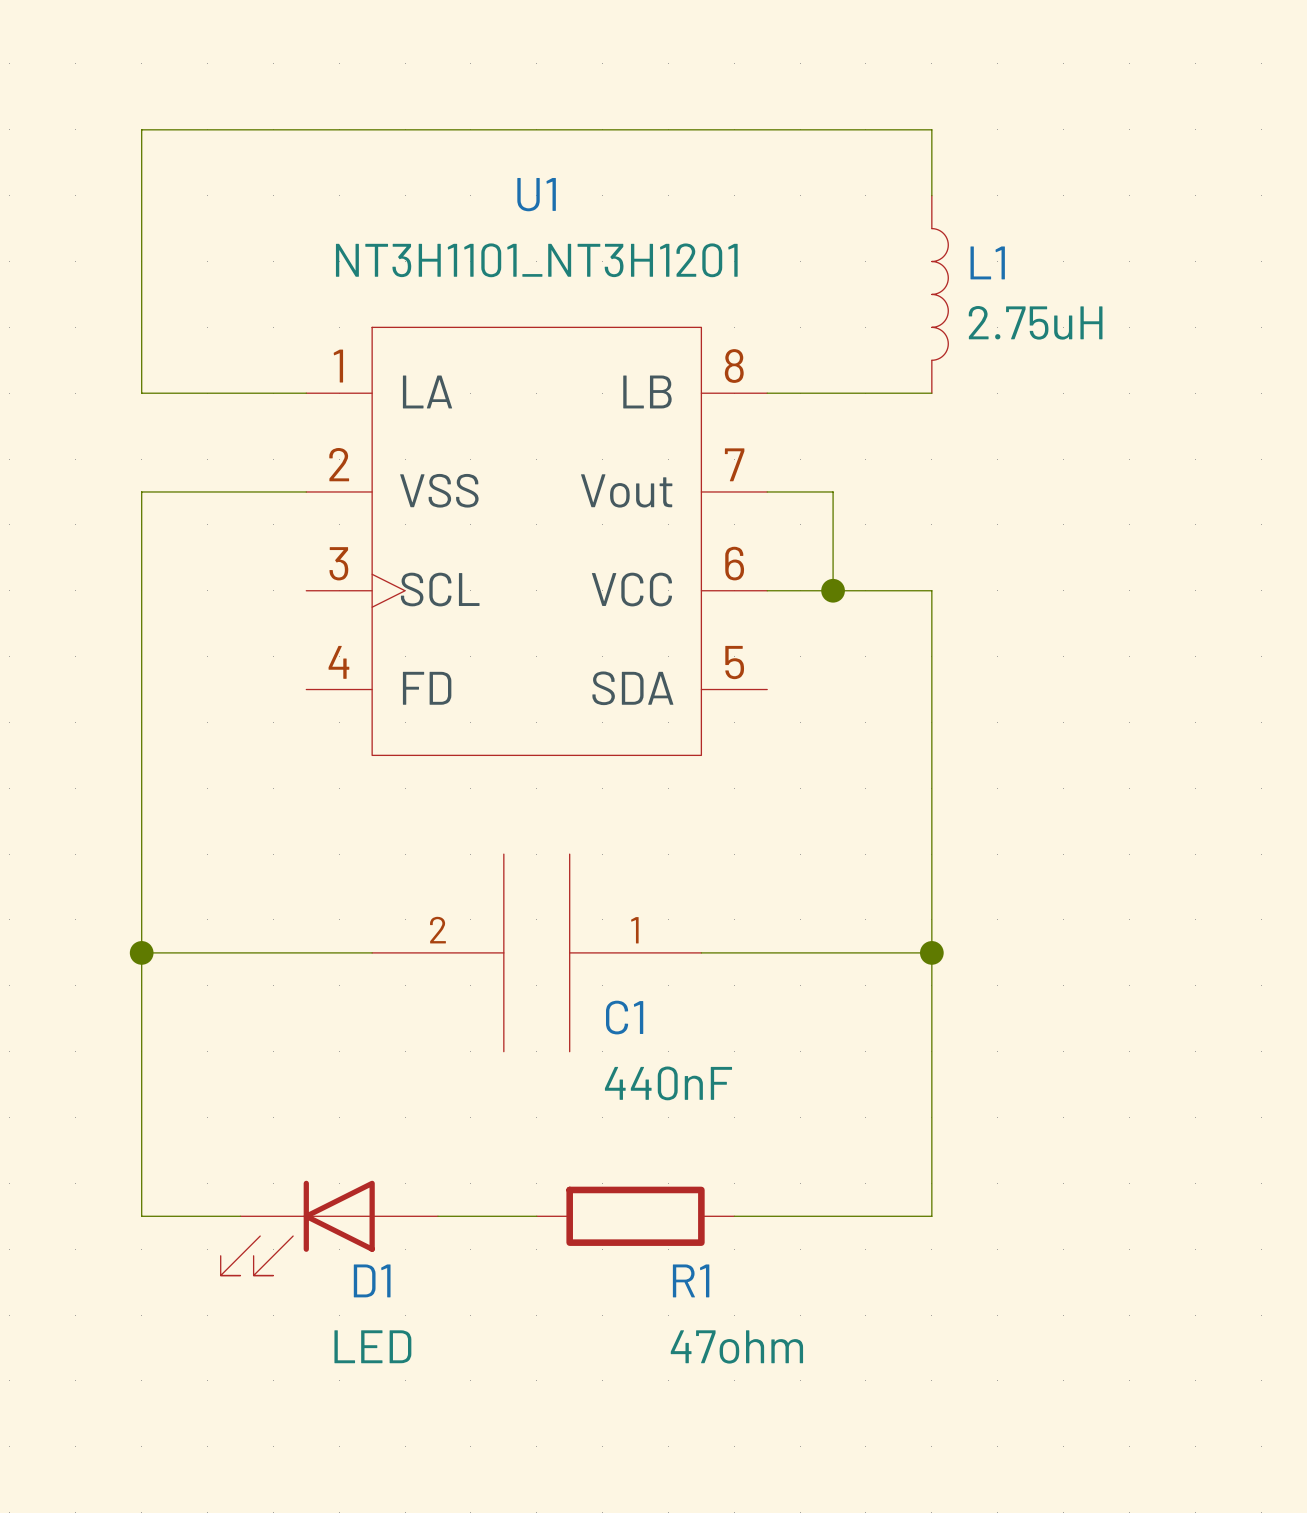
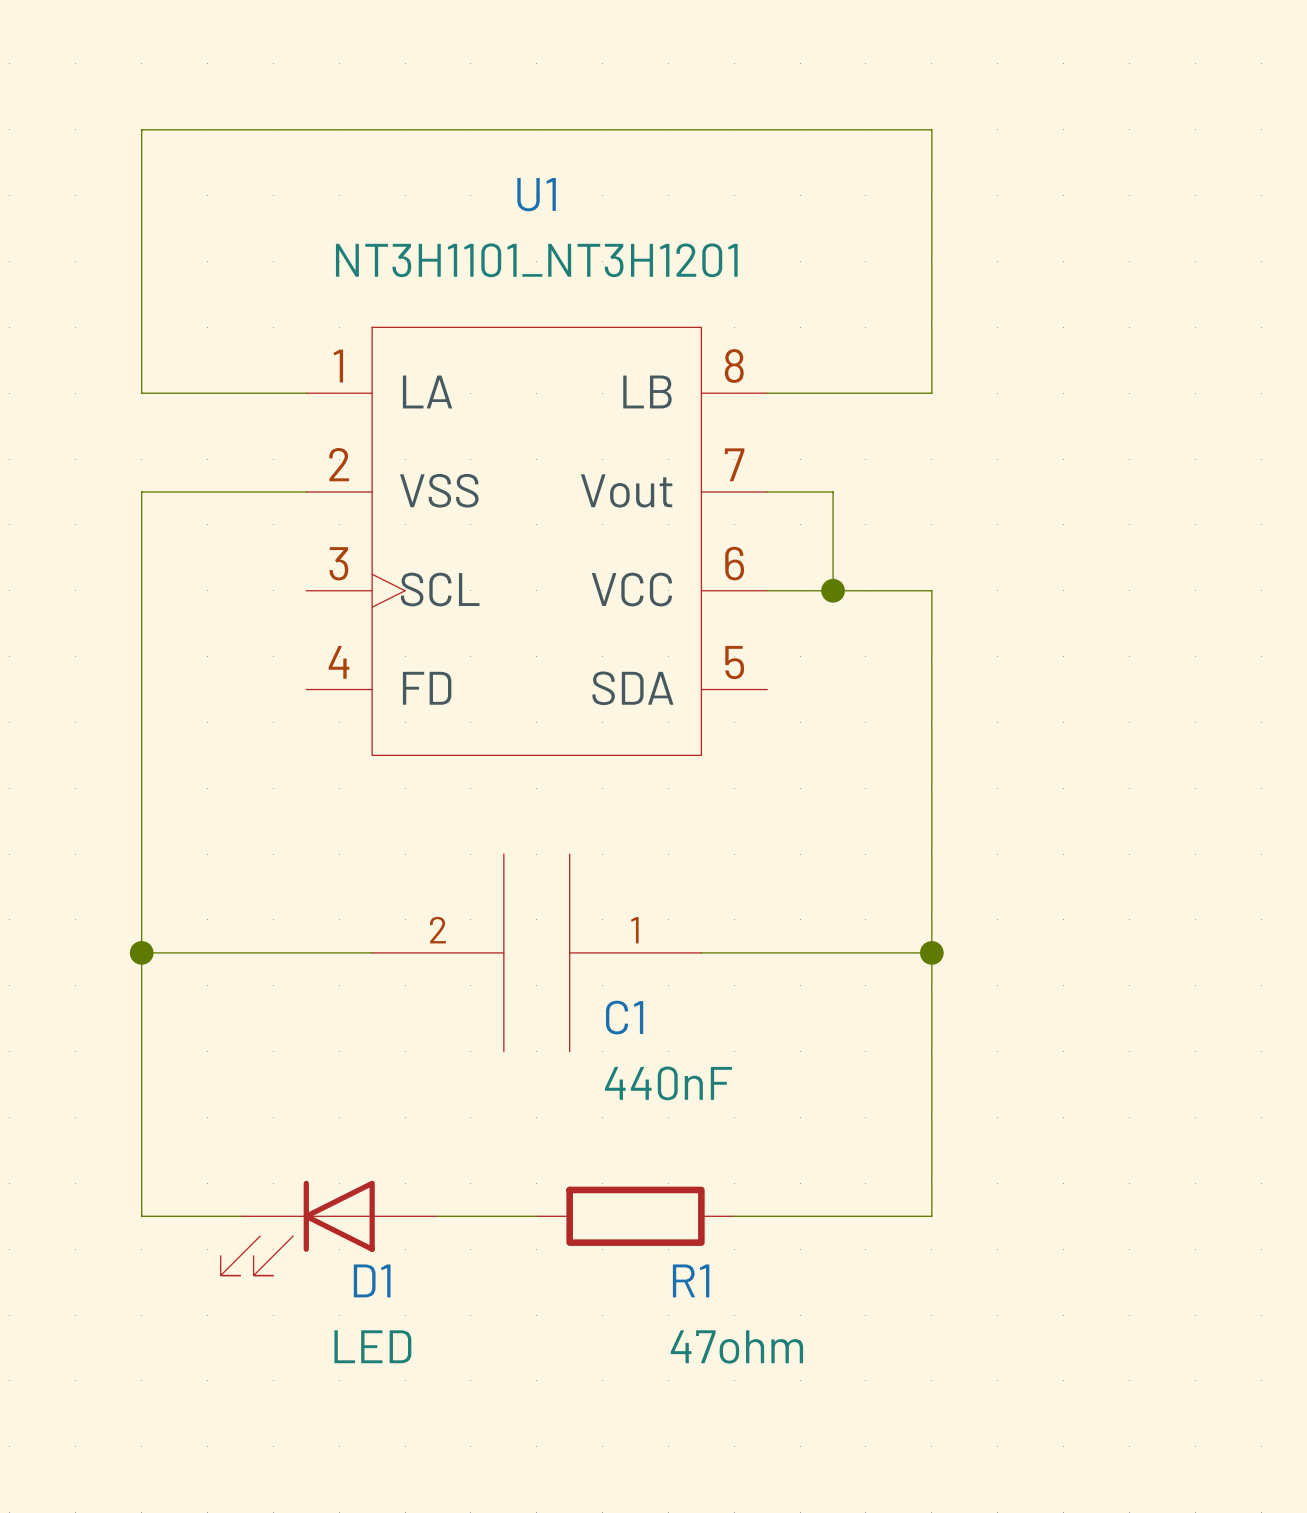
wire: none -> (931, 195) (931, 393)
L1: 2.75uH (940, 294) -> none

